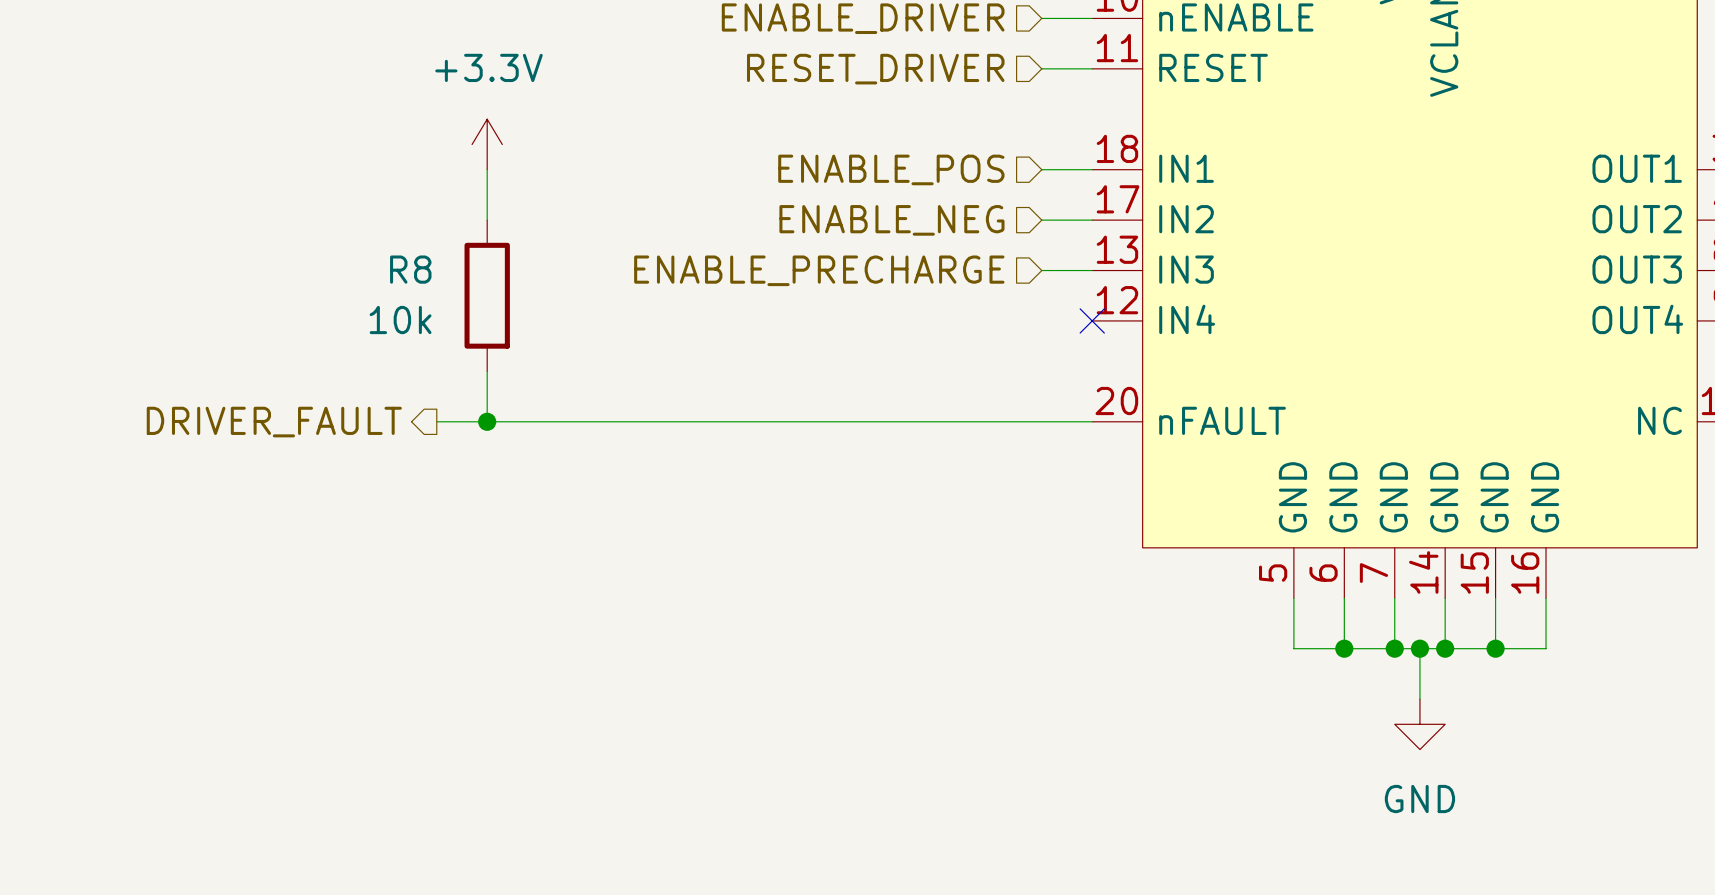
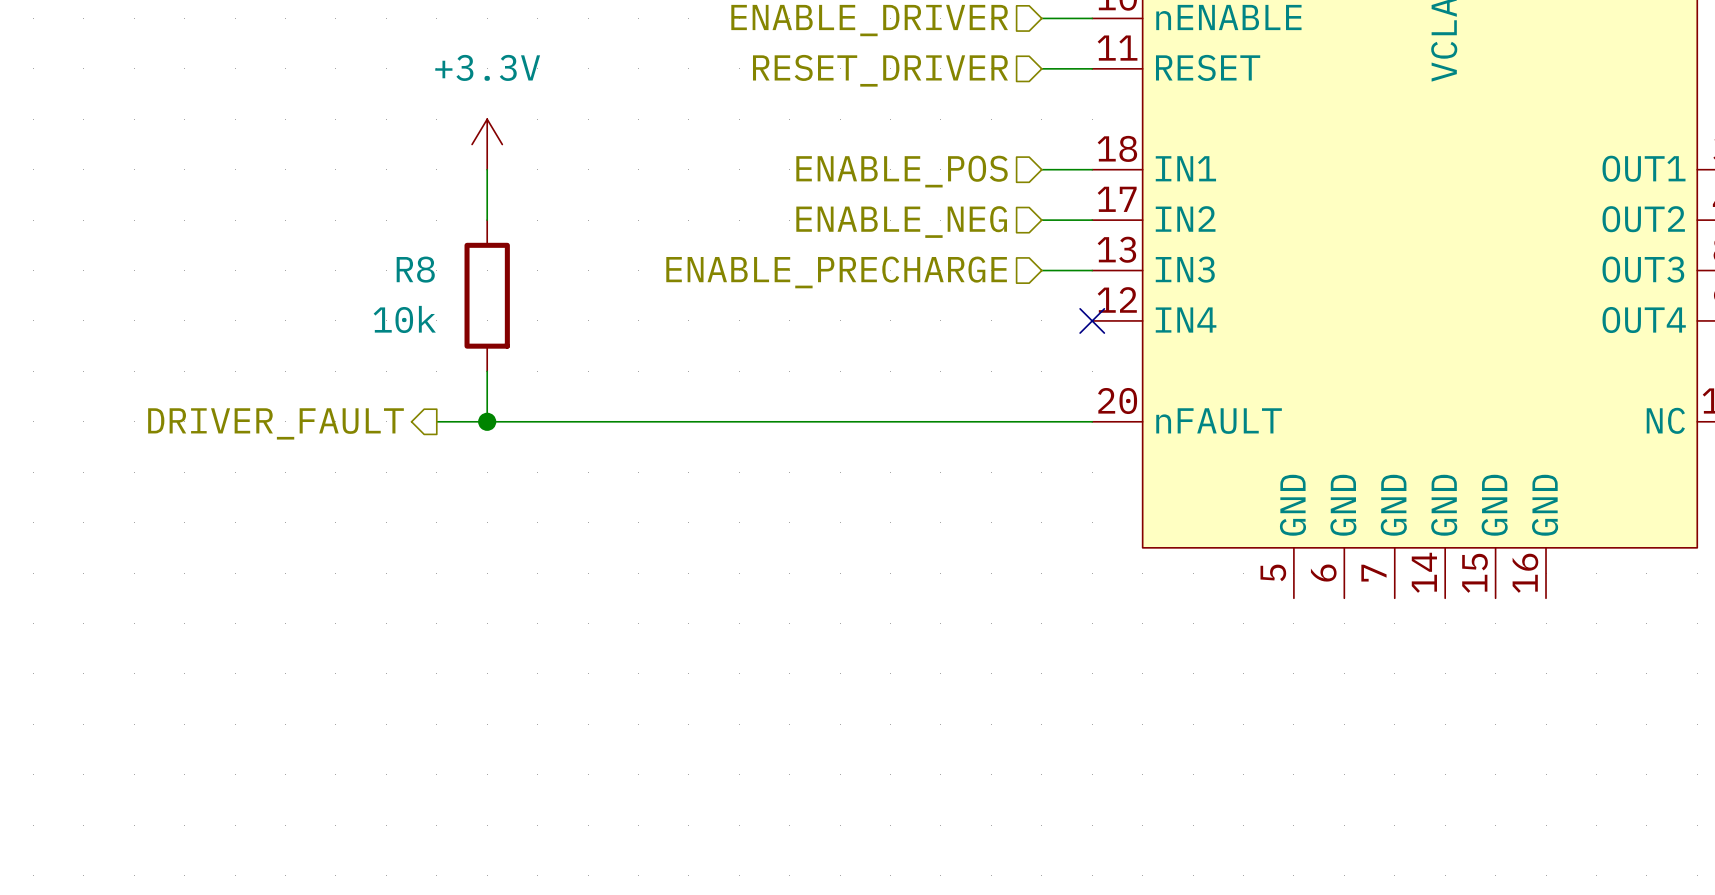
wire: (1293, 598) (1293, 648) (1546, 648) (1546, 598) -> none
wire: (1344, 598) (1344, 648) -> none
wire: (1394, 598) (1394, 648) -> none
wire: (1445, 598) (1445, 648) -> none
wire: (1495, 598) (1495, 648) -> none
junction: (1344, 648) -> none
junction: (1394, 648) -> none
wire: (1419, 648) (1419, 699) -> none
junction: (1419, 648) -> none
junction: (1445, 648) -> none
junction: (1495, 648) -> none
power symbol: GND (1419, 724) -> none

